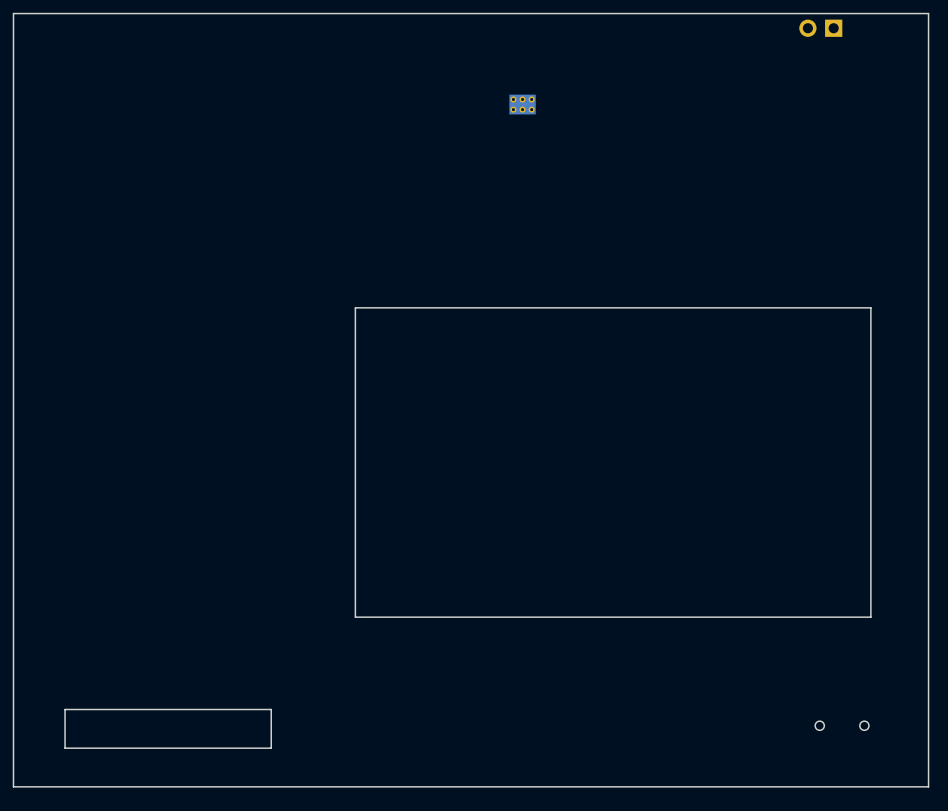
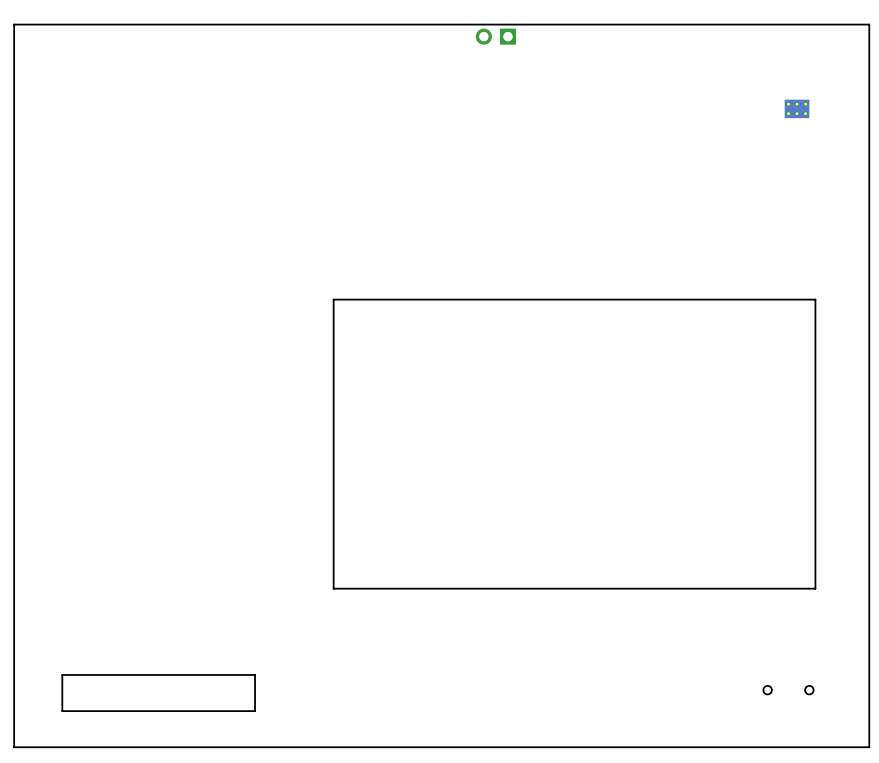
part: none -> (495, 36)
part: (820, 28) -> none
part: none -> (797, 108)
part: (522, 104) -> none

